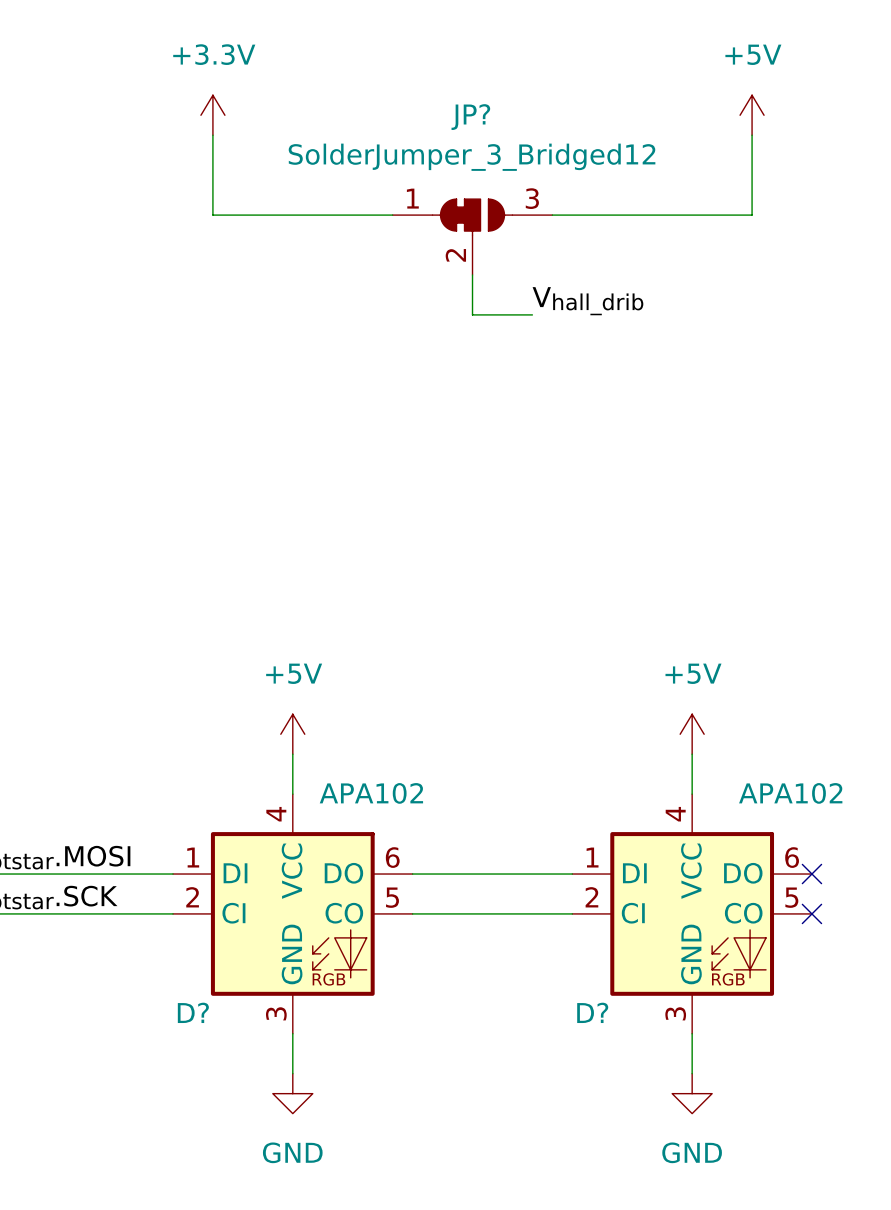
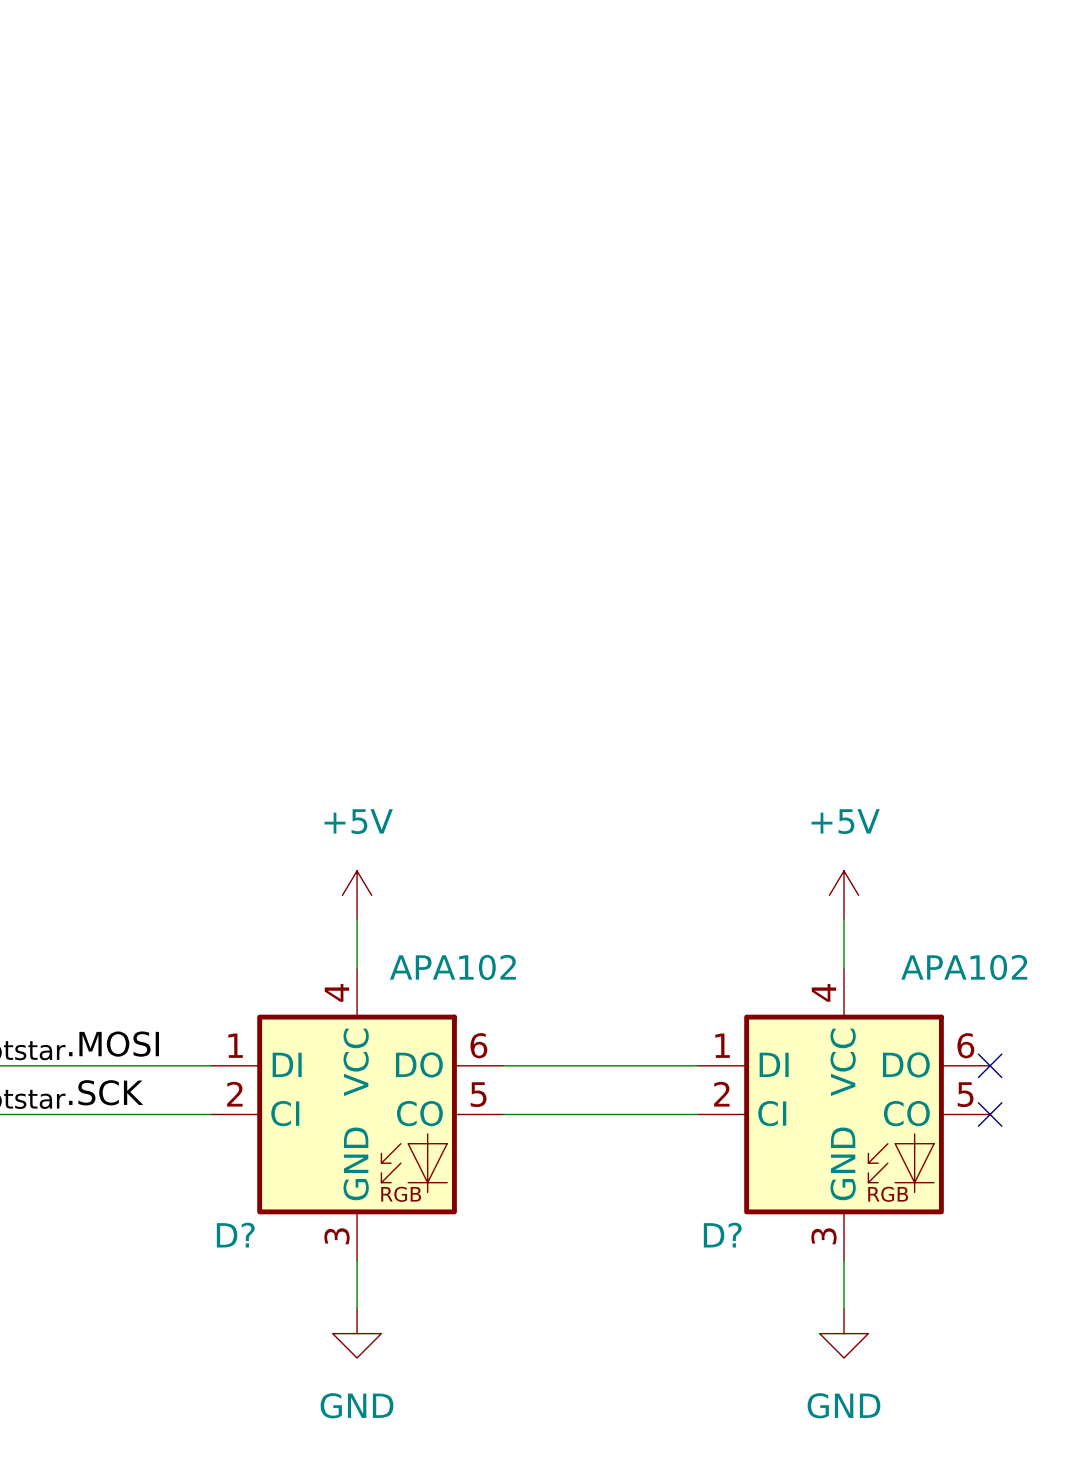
power symbol: +3.3V (212, 115) -> none
power symbol: +5V (752, 115) -> none
wire: (212, 135) (212, 215) (392, 215) -> none
wire: (752, 135) (752, 215) (552, 215) -> none
JP?: SolderJumper_3_Bridged12 (472, 237) -> none
wire: (472, 274) (472, 314) (532, 314) -> none
label: Vhall_drib (587, 301) -> none

